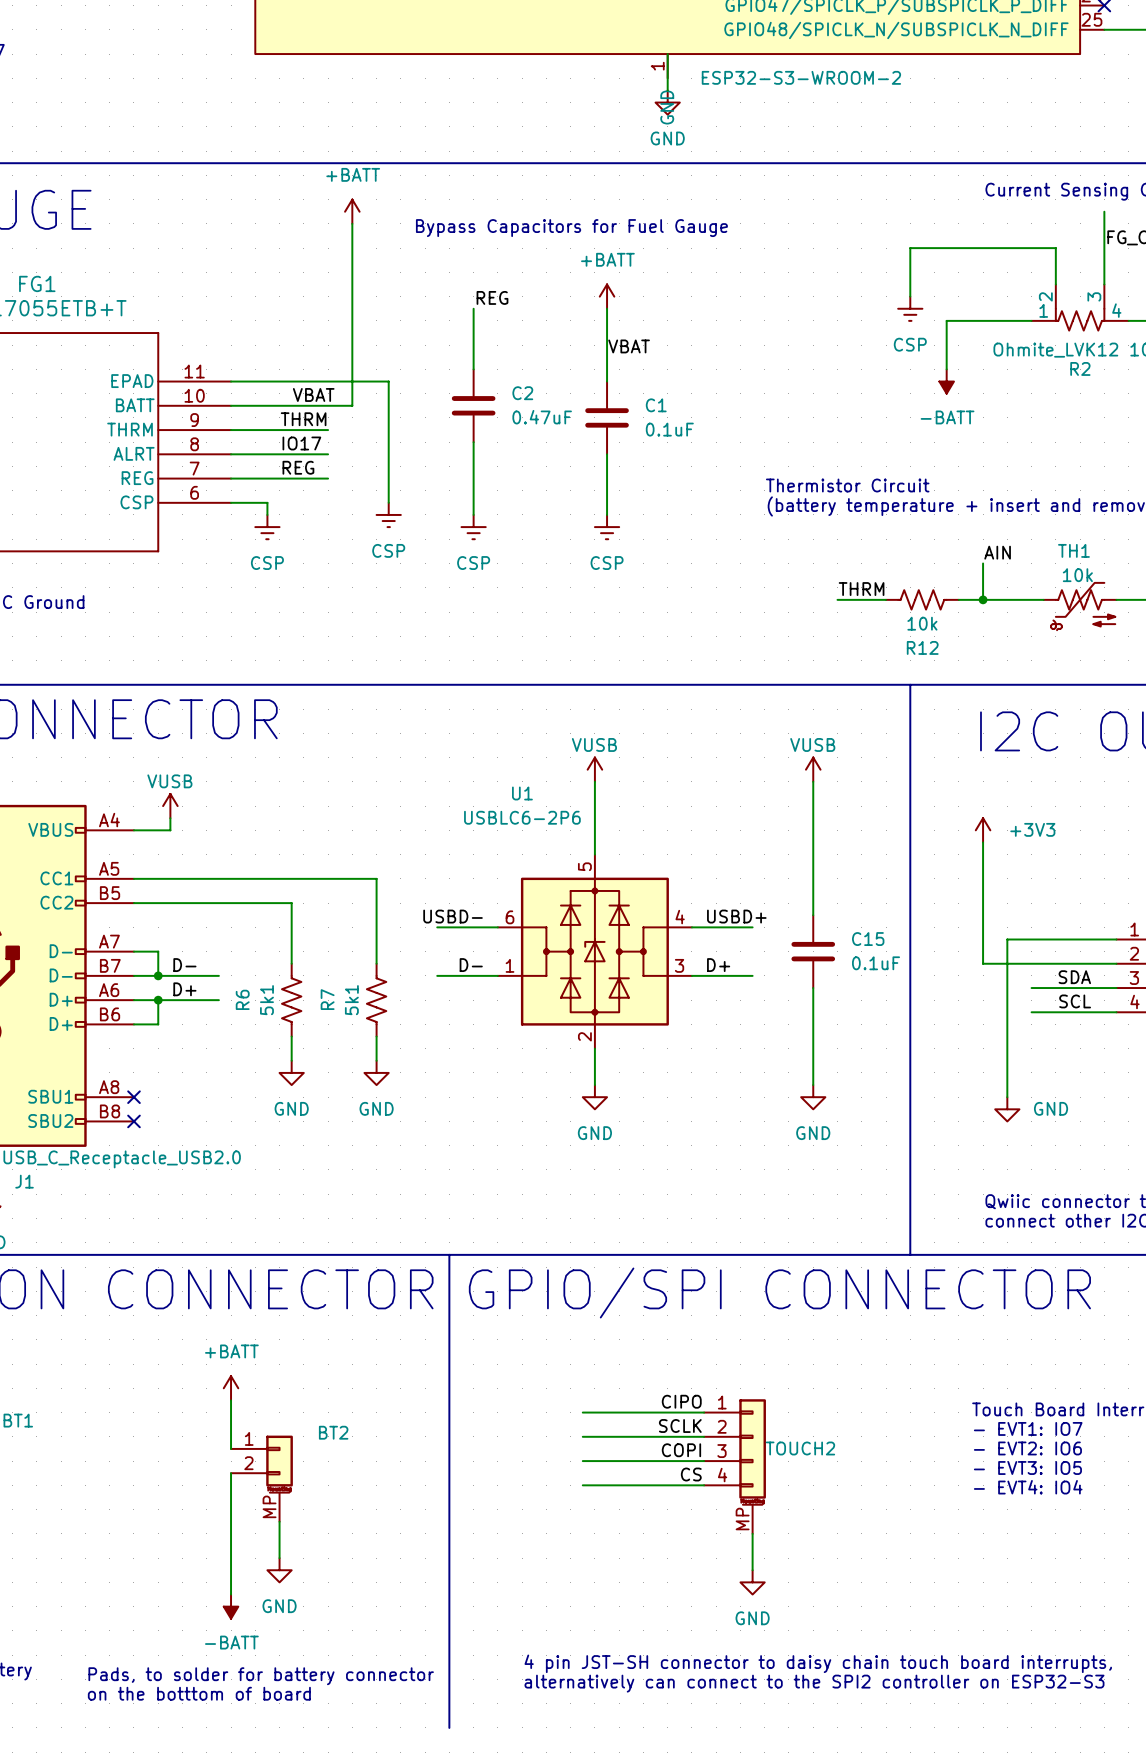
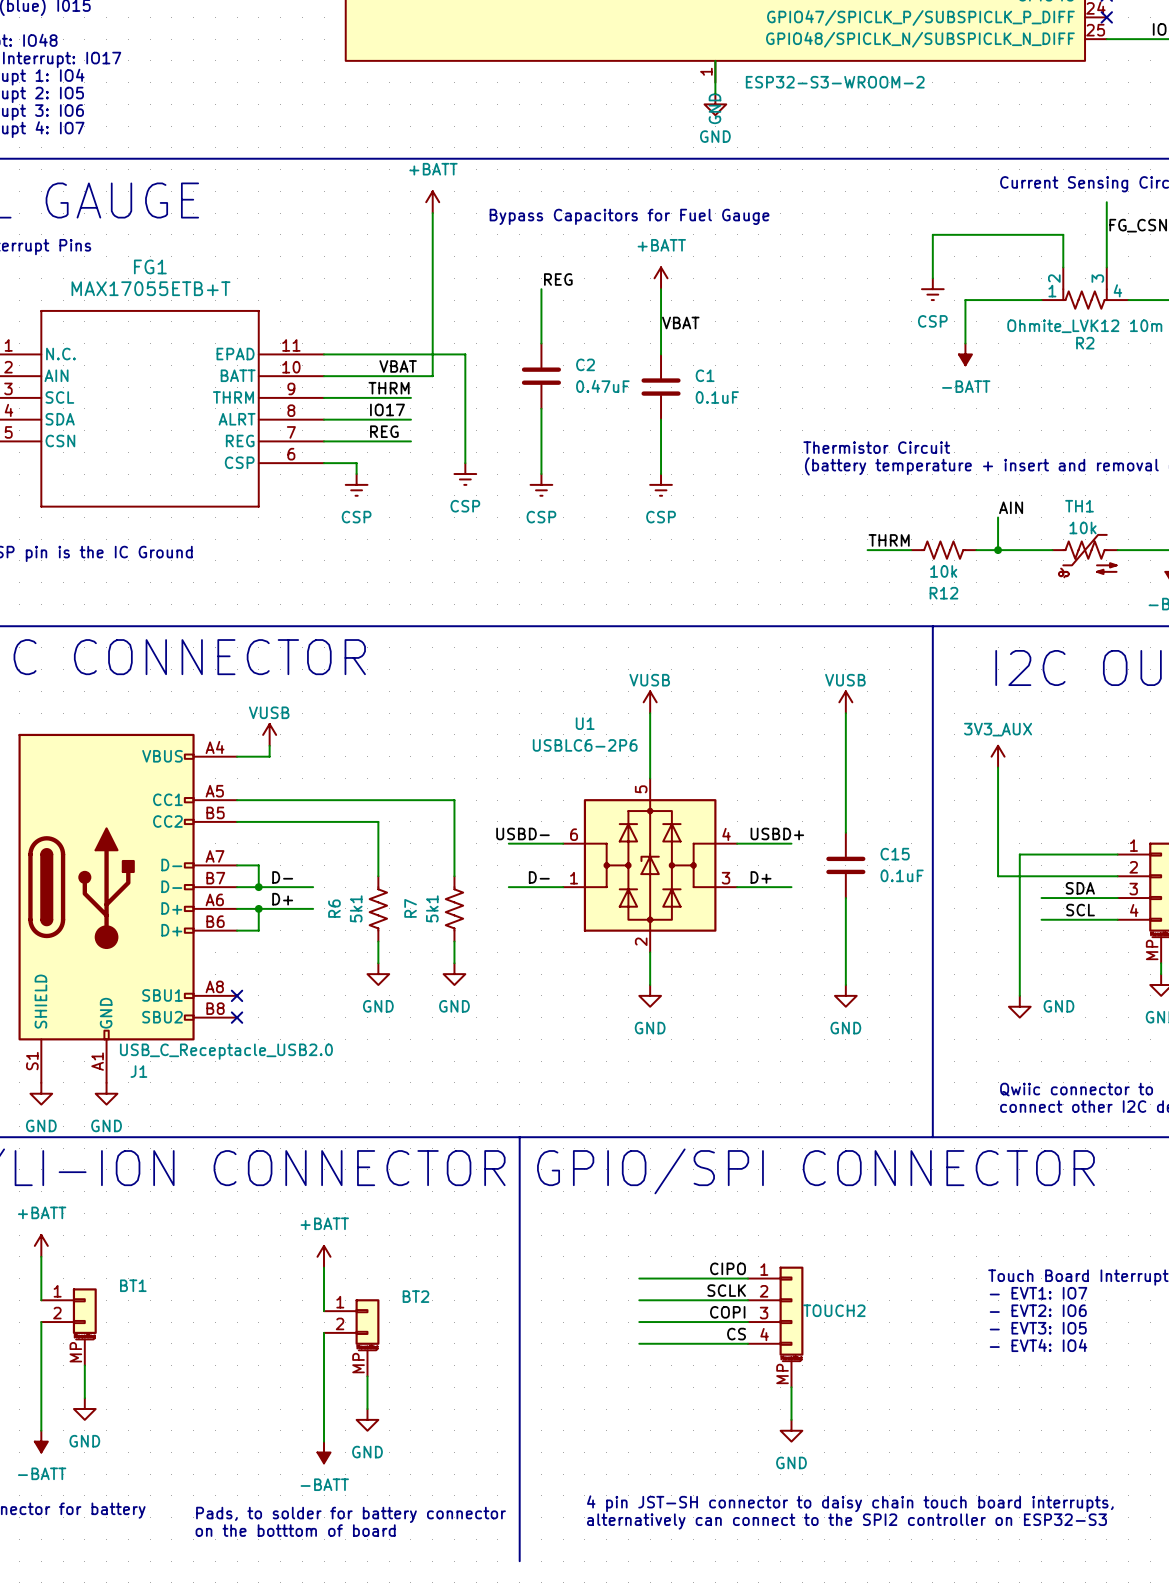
power symbol: +3V3 (983, 830) -> 3V3_AUX (998, 756)

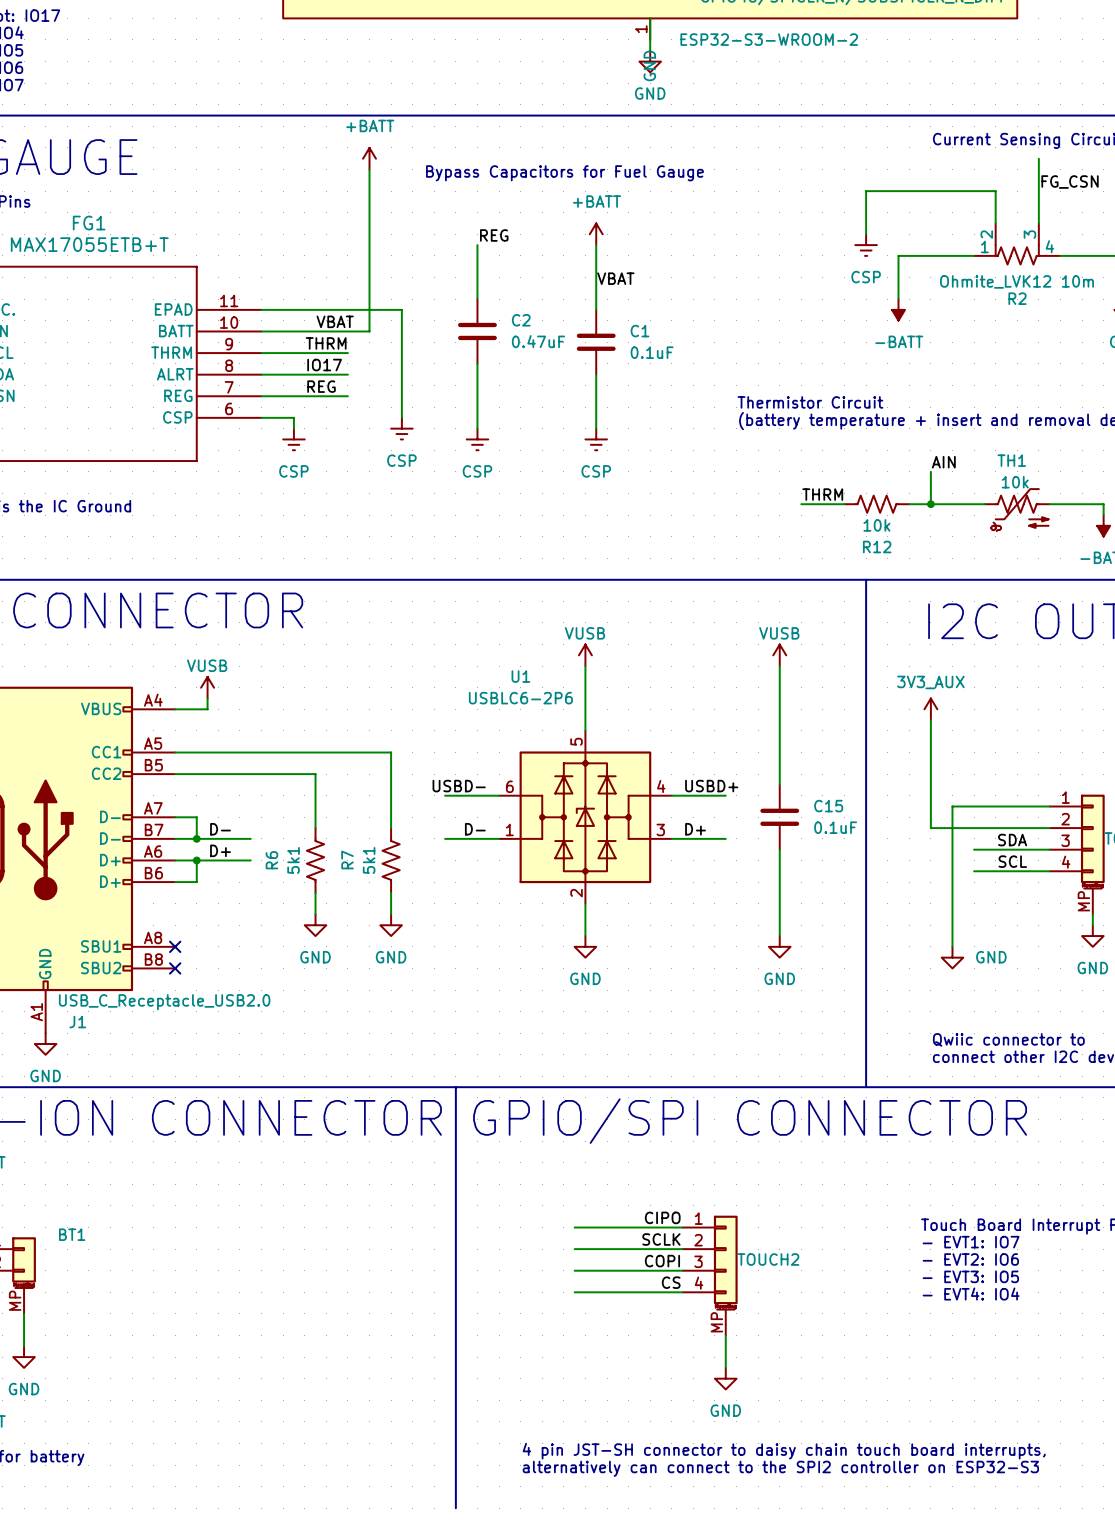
power symbol: +BATT (324, 1256) -> none
wire: (324, 1267) (324, 1311) -> none
wire: (324, 1332) (324, 1441) -> none
BT2: (351, 1337) -> none
wire: (367, 1376) (367, 1409) -> none
power symbol: GND (367, 1419) -> none
power symbol: -BATT (324, 1452) -> none
text: Pads, to solder for battery connector (351, 1514) -> none
text: on the botttom of board (295, 1530) -> none

